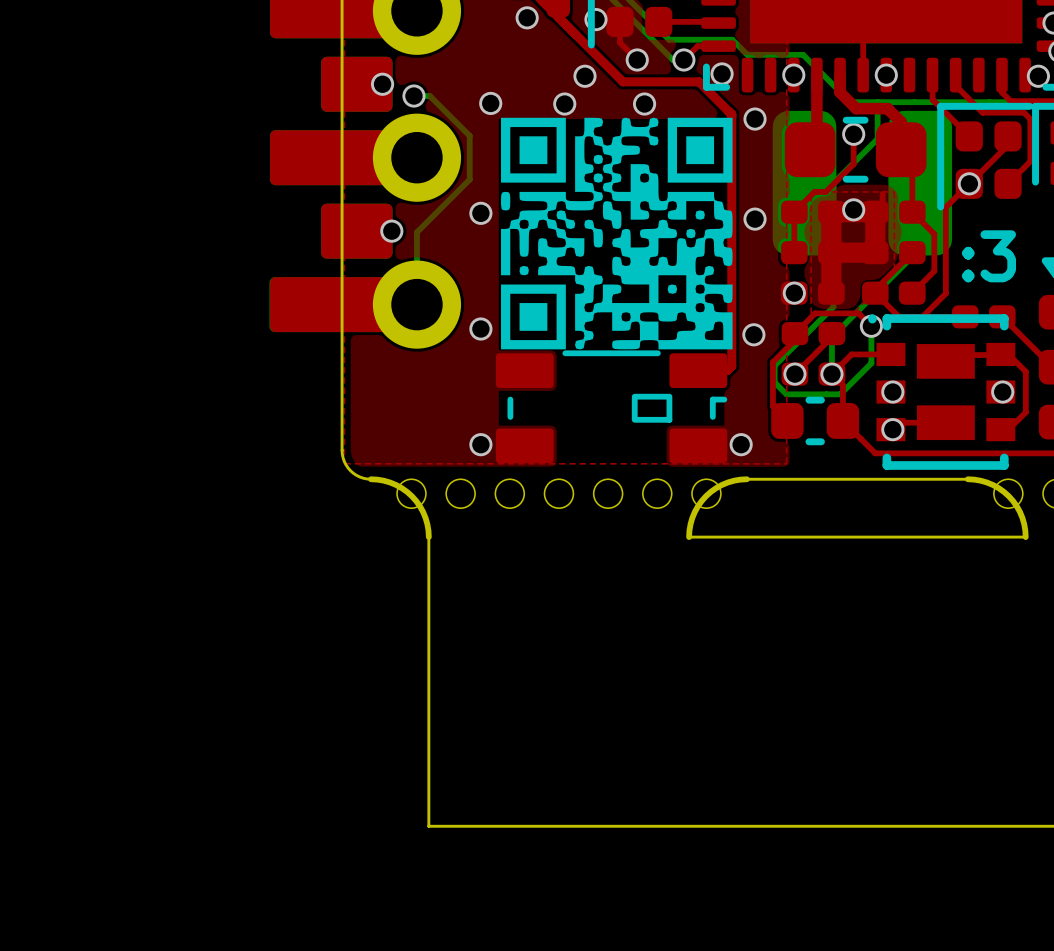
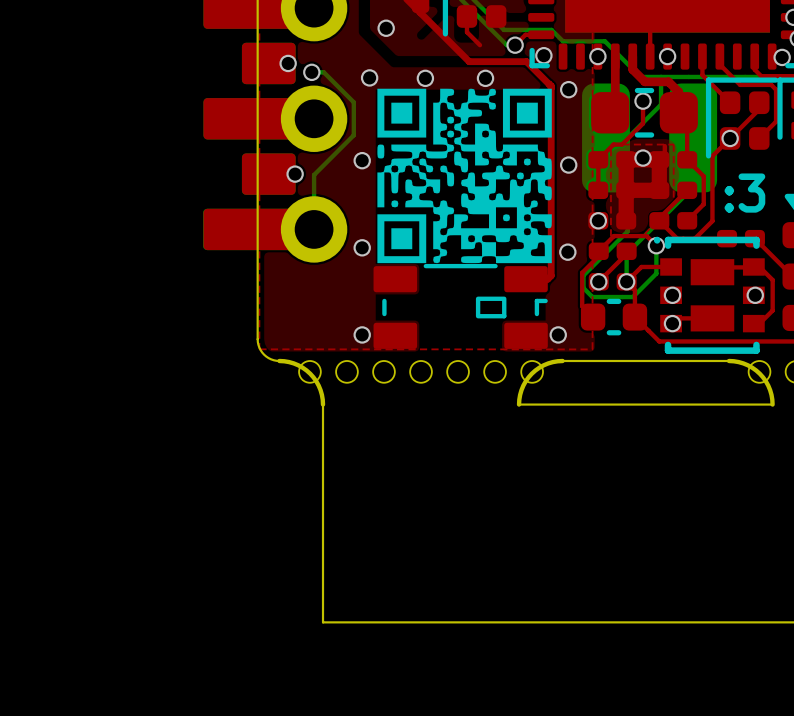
via position: (527, 17) -> (386, 28)
via: (595, 19) -> none
top track: (658, 21) (718, 23) -> none
via: (637, 59) -> none
via: (584, 76) -> none

